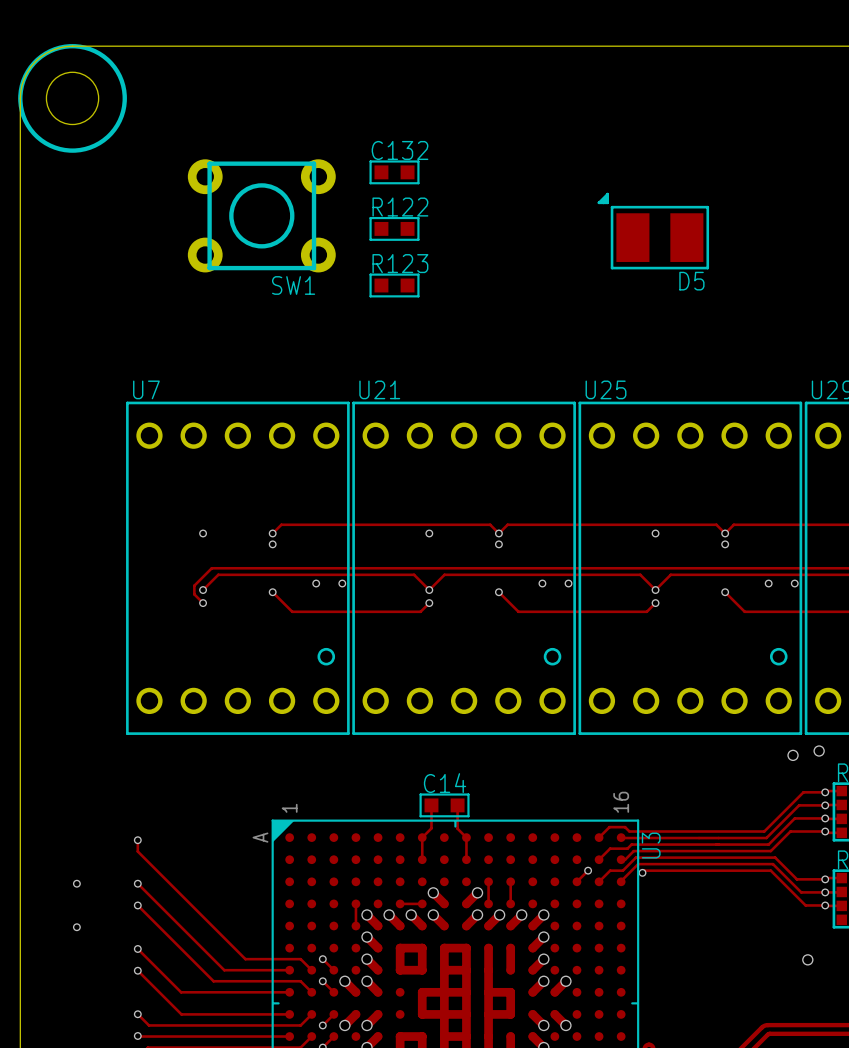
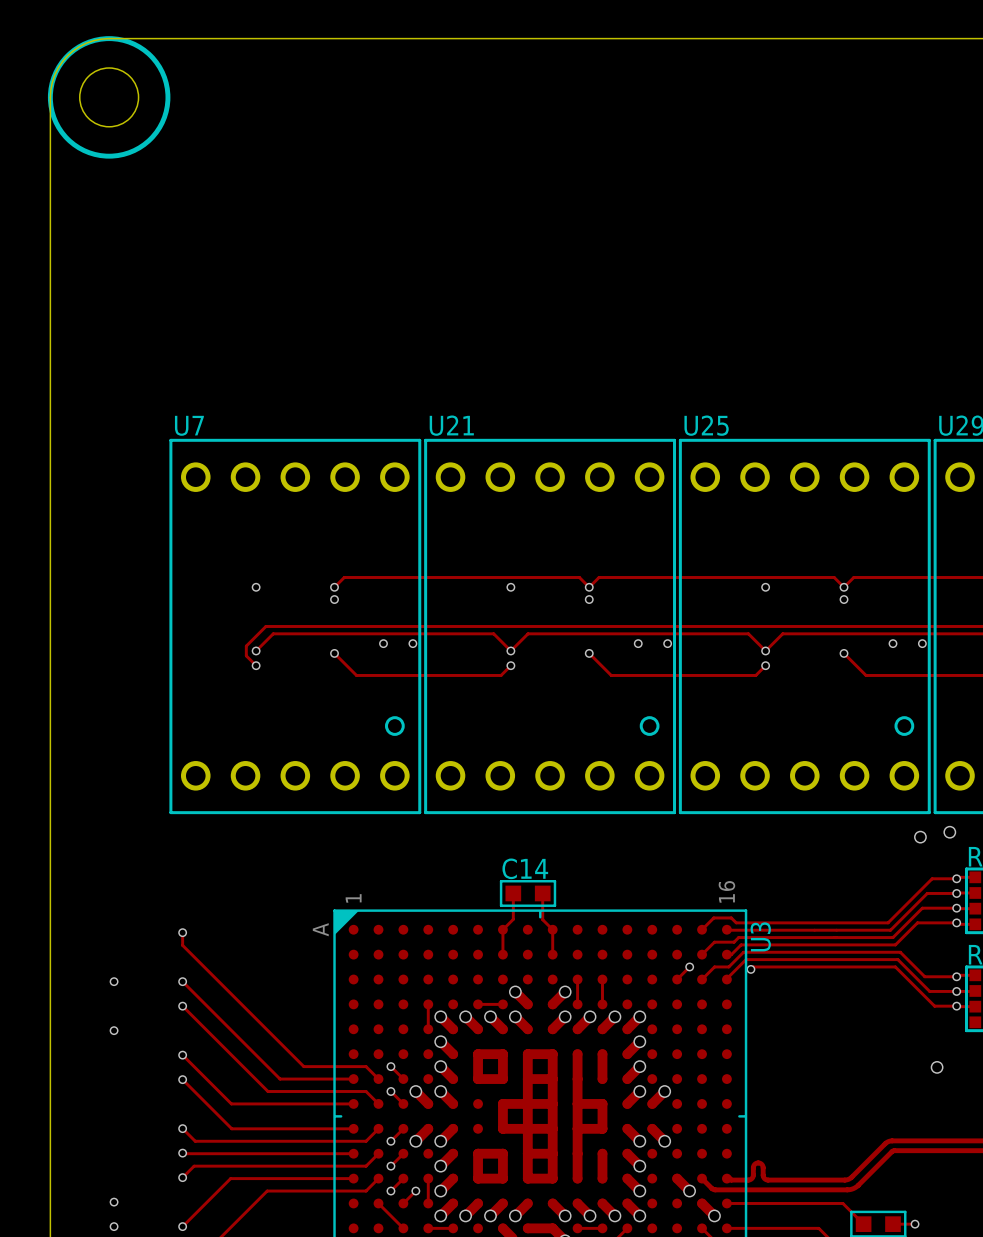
C132: (394, 172) -> none
SW1: (261, 215) -> none
R122: (394, 228) -> none
D5: (653, 231) -> none
R123: (394, 285) -> none

